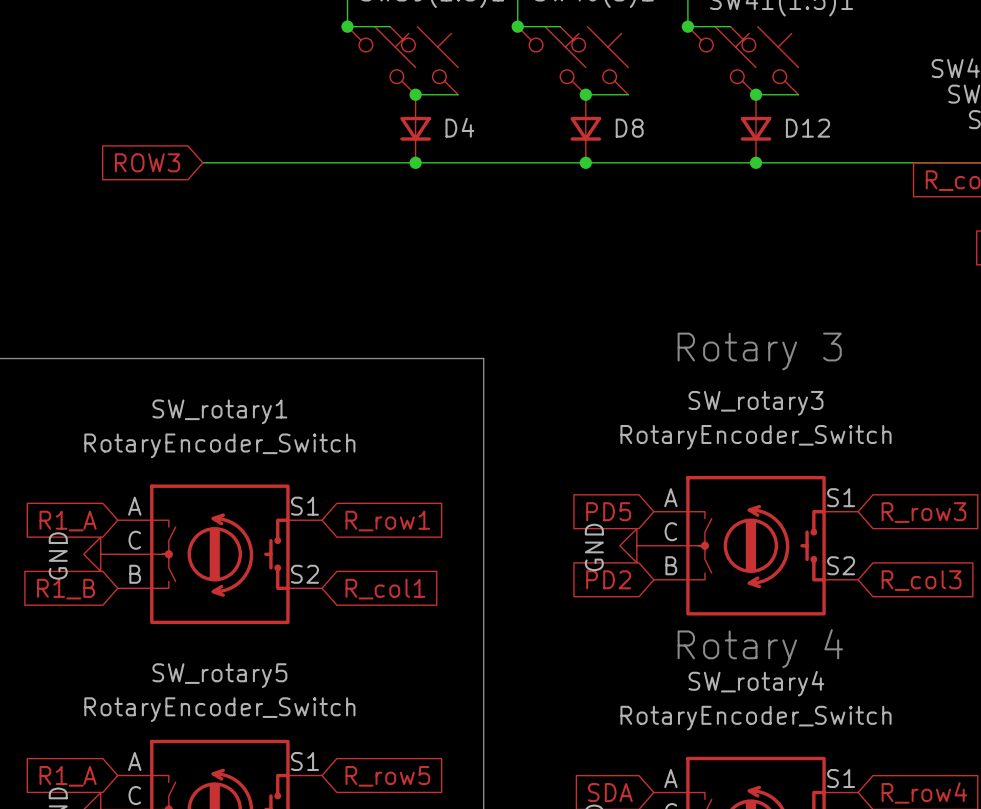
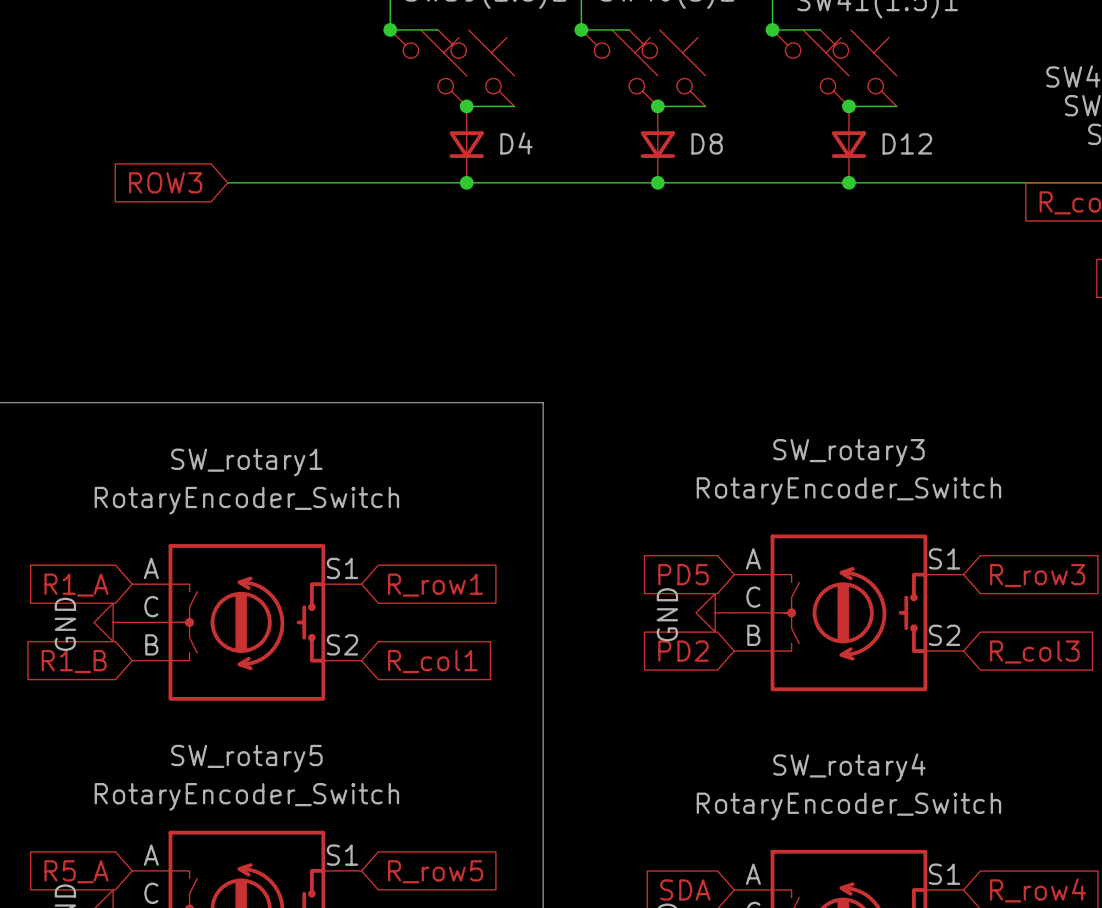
text: Rotary 3 (759, 351) -> none
text: Rotary 4 (760, 648) -> none
global label: R1_A (68, 776) -> R5_A (76, 871)

